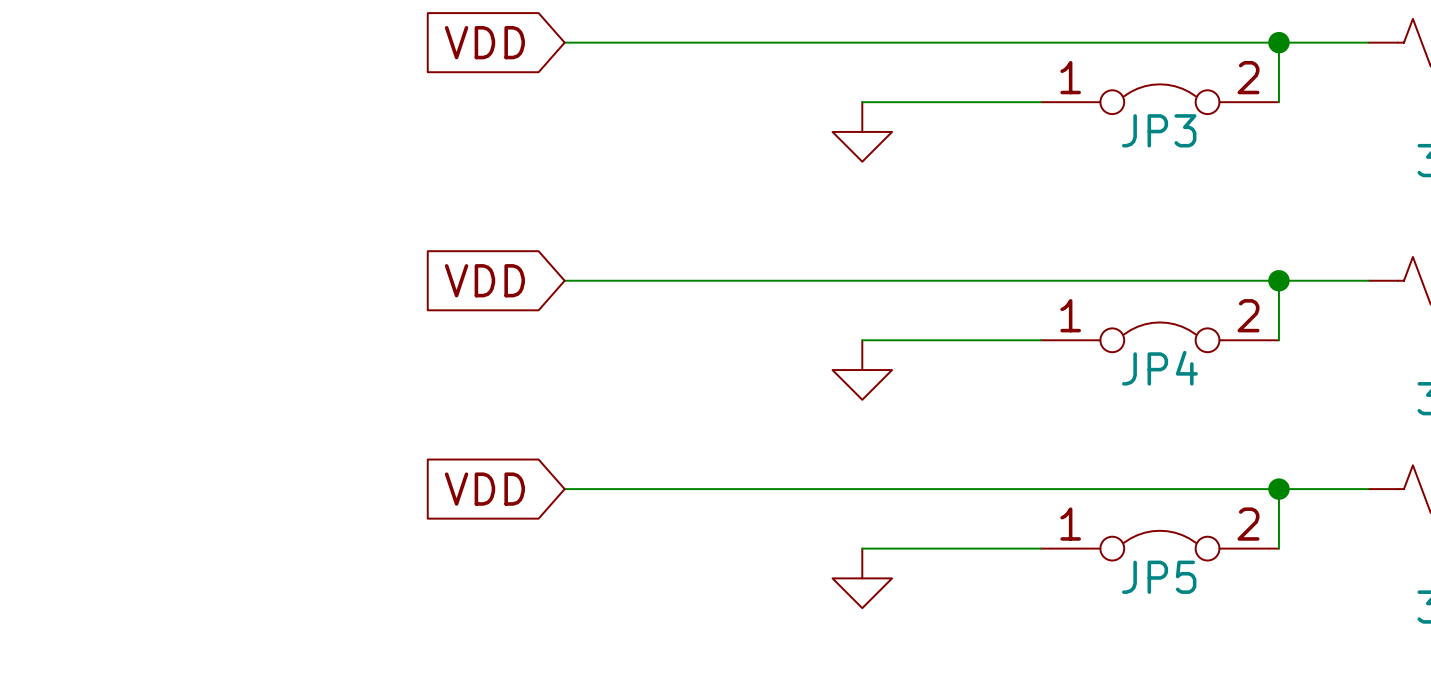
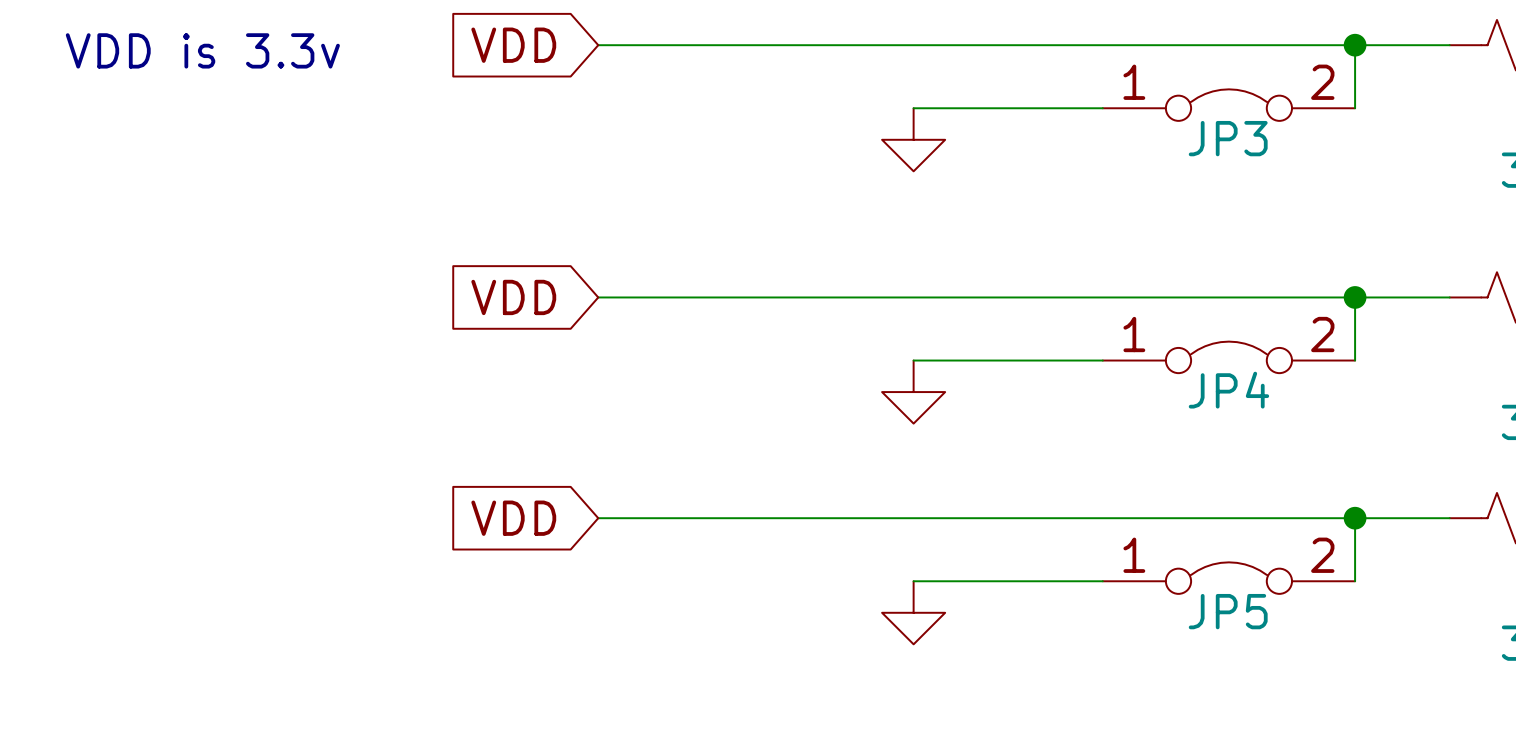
text: none -> VDD is 3.3v (202, 50)

